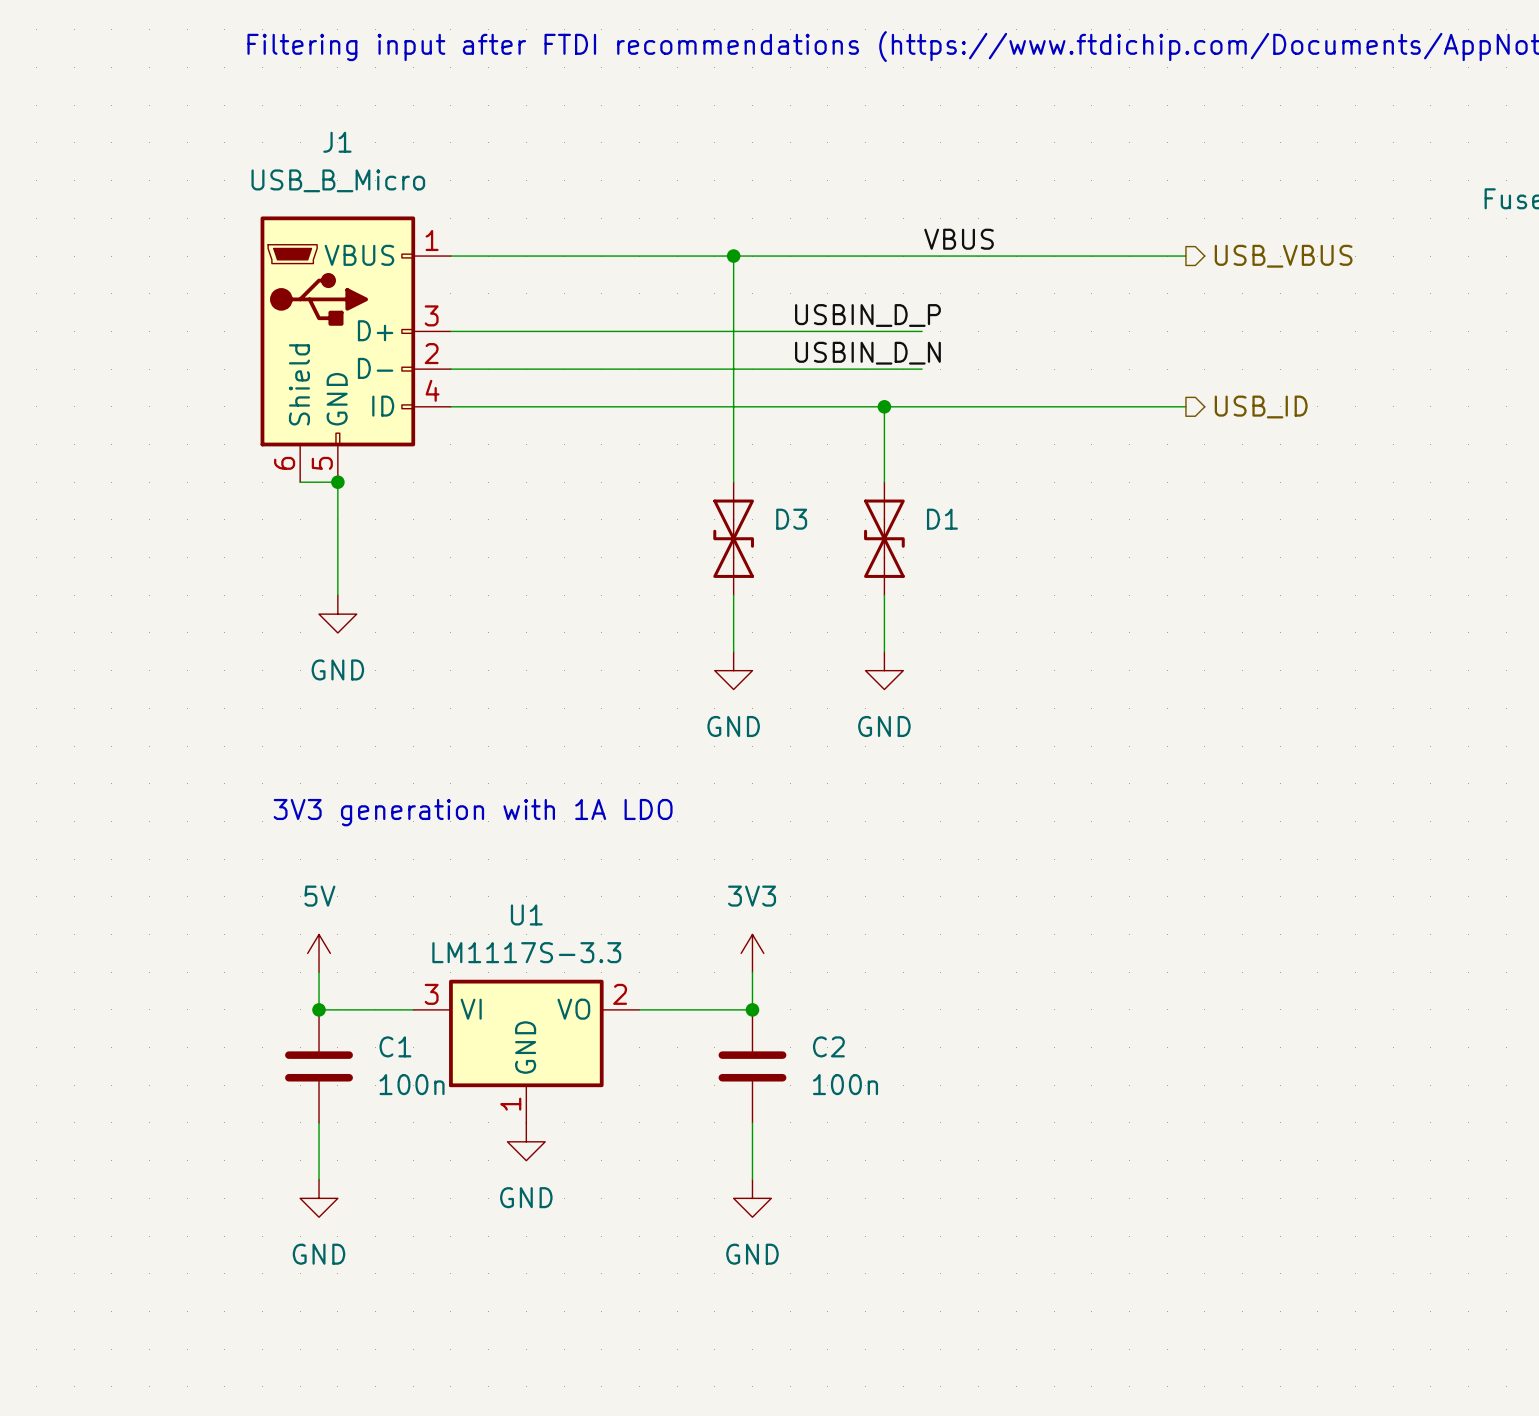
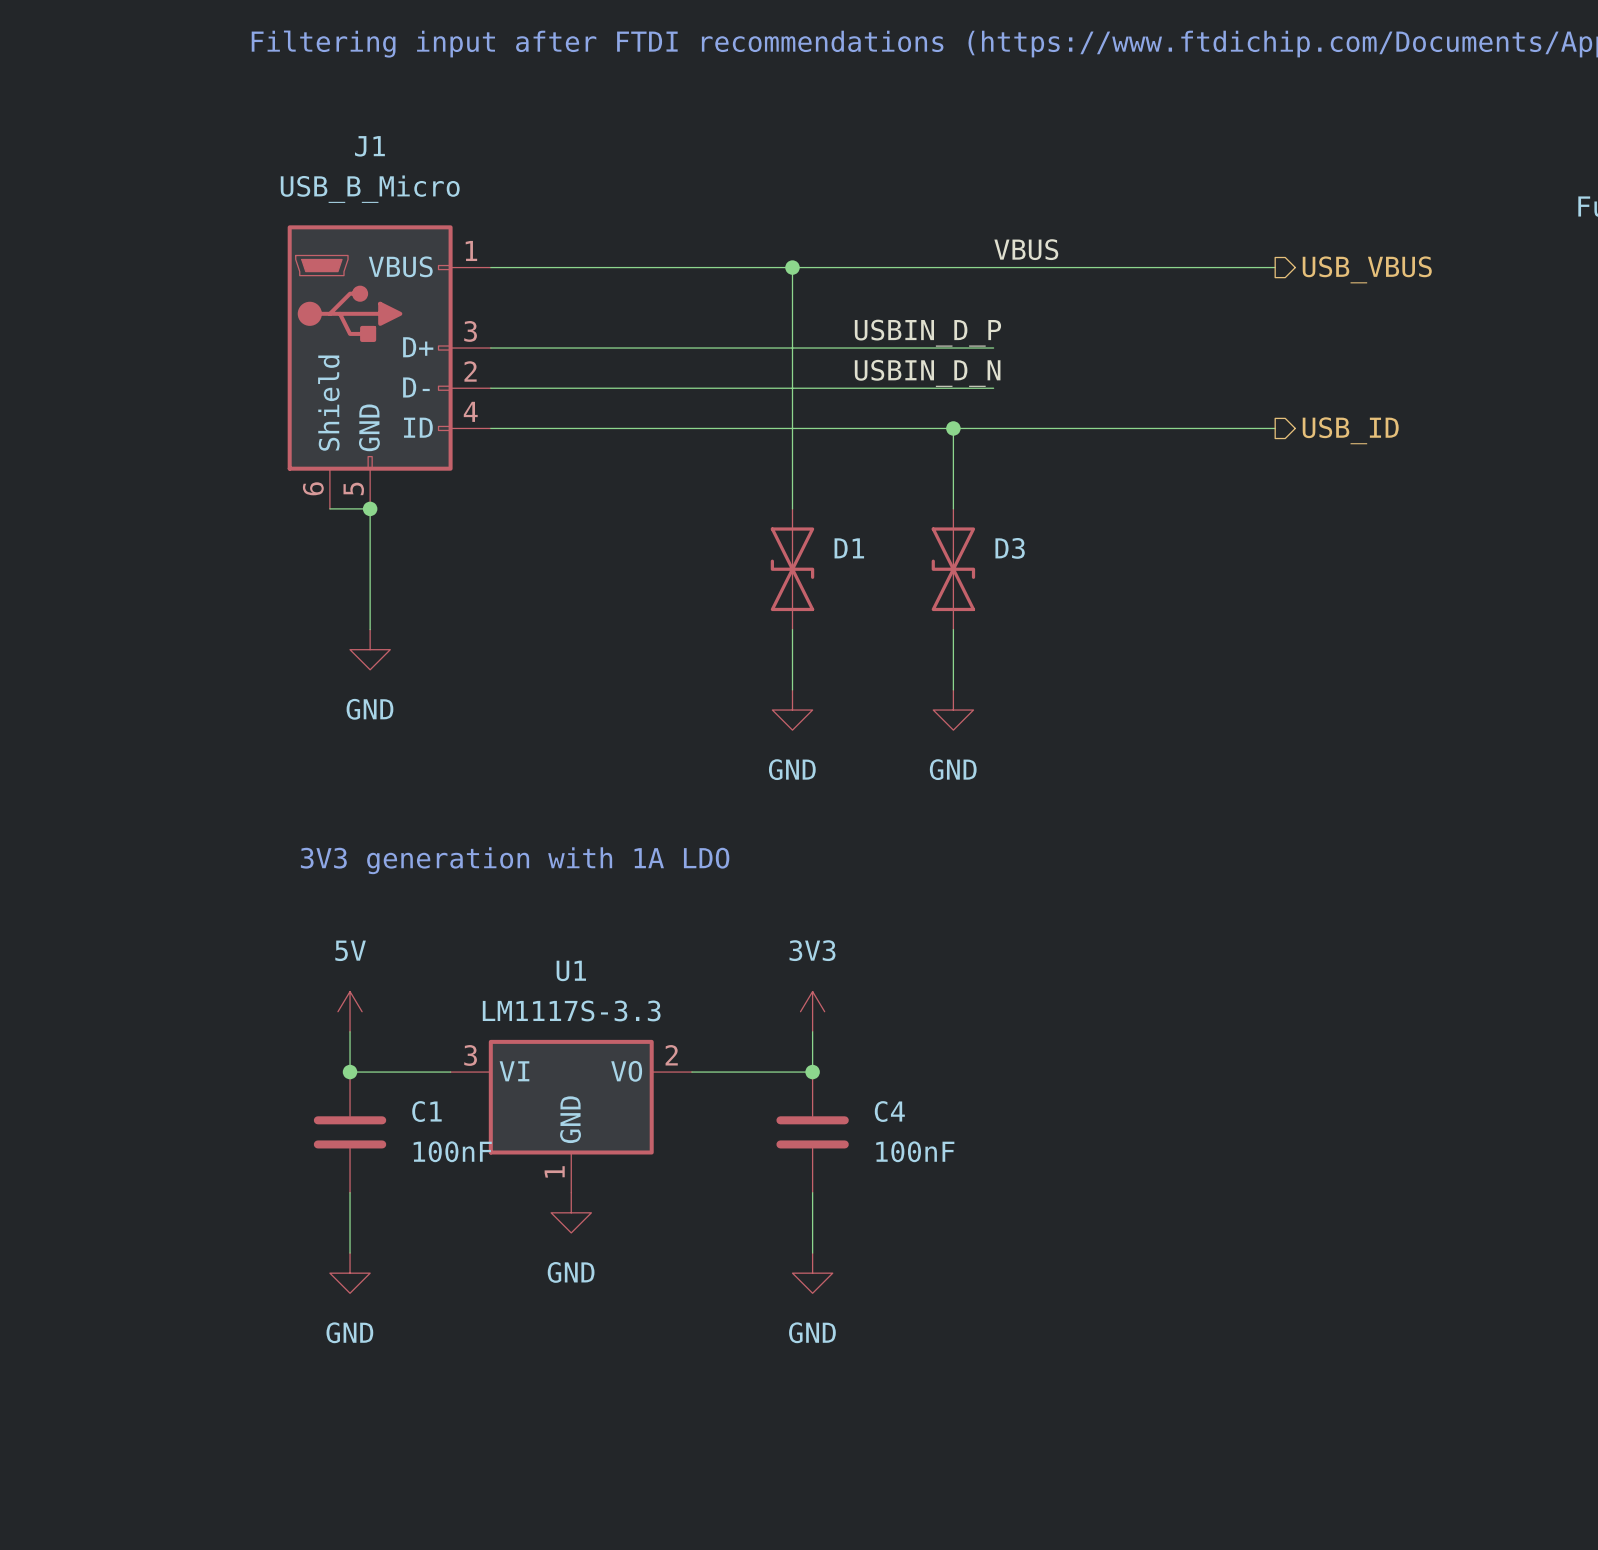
D3 name: D3 (791, 519) -> D1 (849, 548)
D1 name: D1 (942, 519) -> D3 (1010, 548)
C2 name: C2 (828, 1046) -> C4 (889, 1111)
C1 value: 100n (412, 1084) -> 100nF (452, 1151)
C2 value: 100n (845, 1084) -> 100nF (915, 1151)

